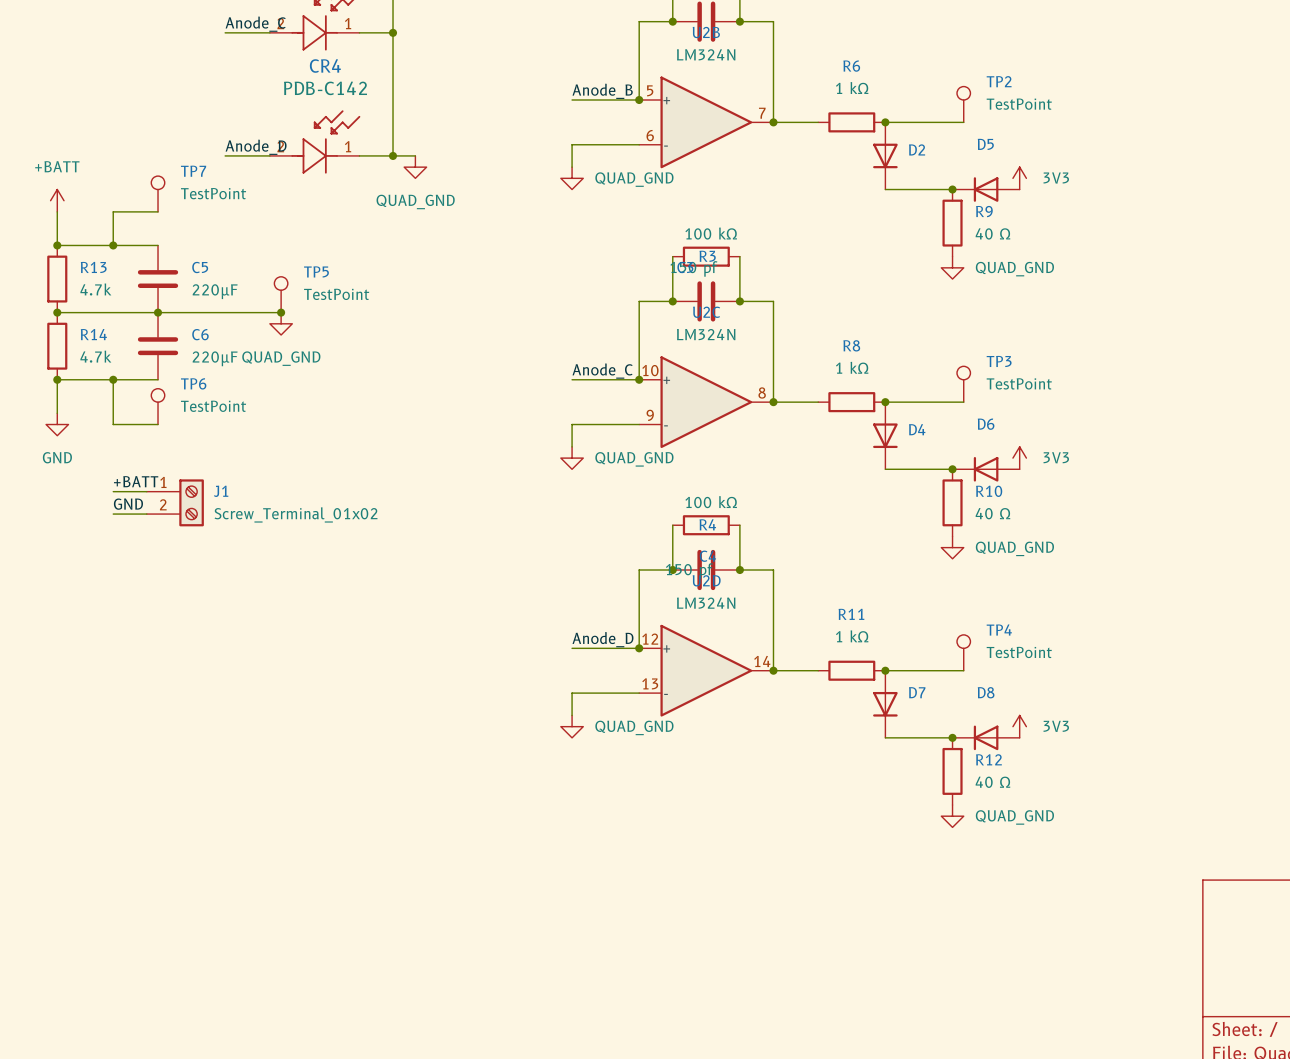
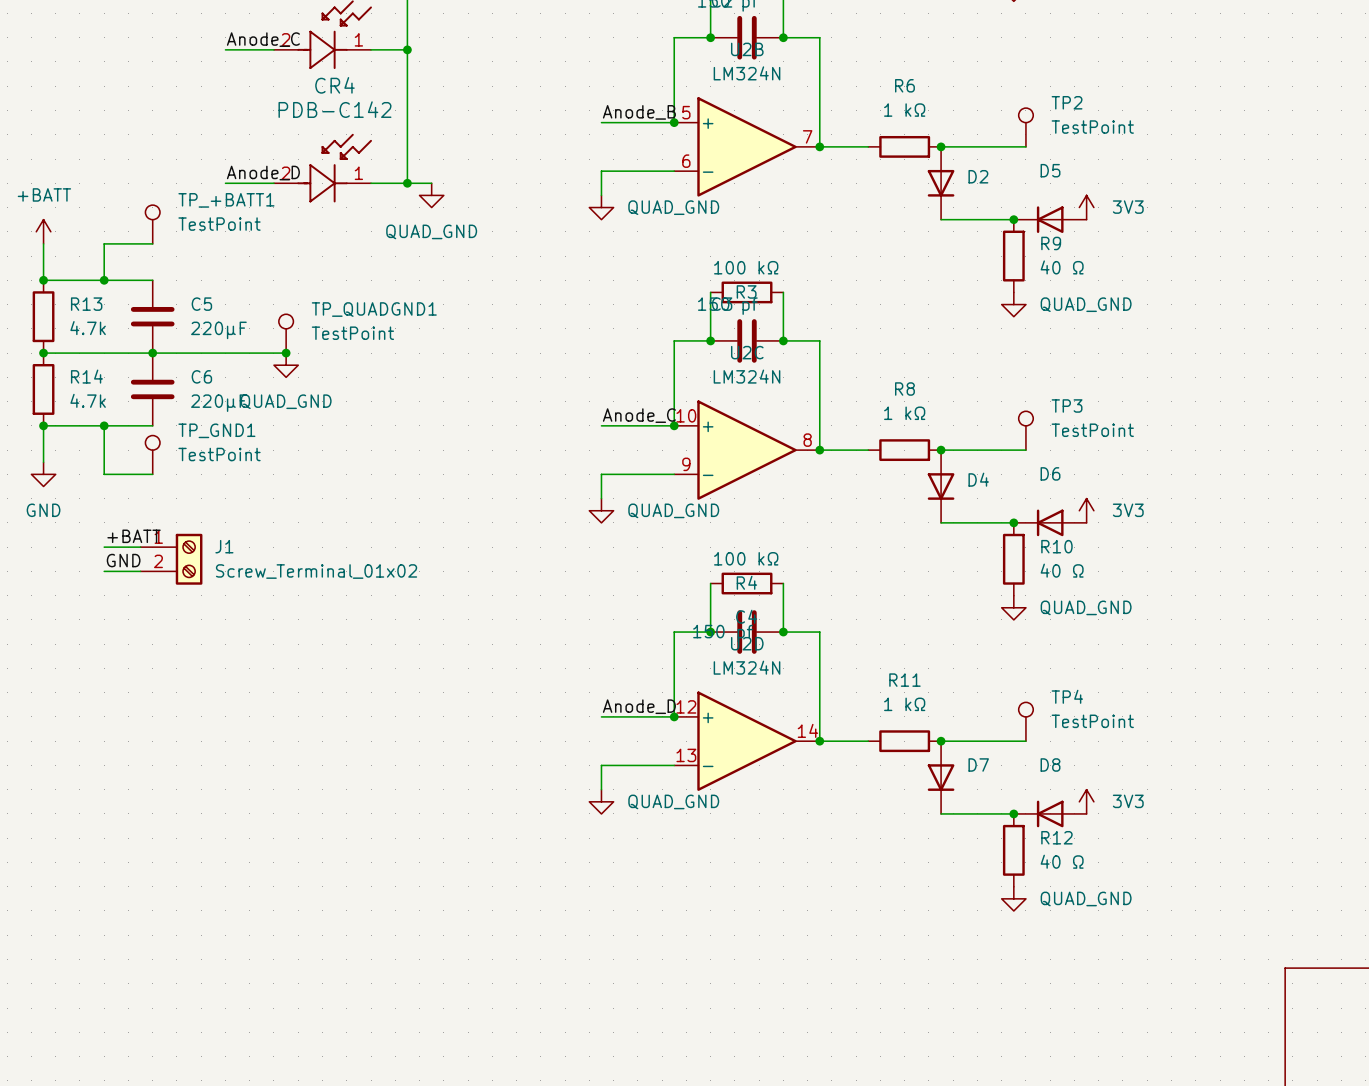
TP7 name: TP7 (193, 171) -> TP_+BATT1 (226, 200)
TP5 name: TP5 (316, 271) -> TP_QUADGND1 (374, 309)
TP6 name: TP6 (193, 383) -> TP_GND1 (216, 430)

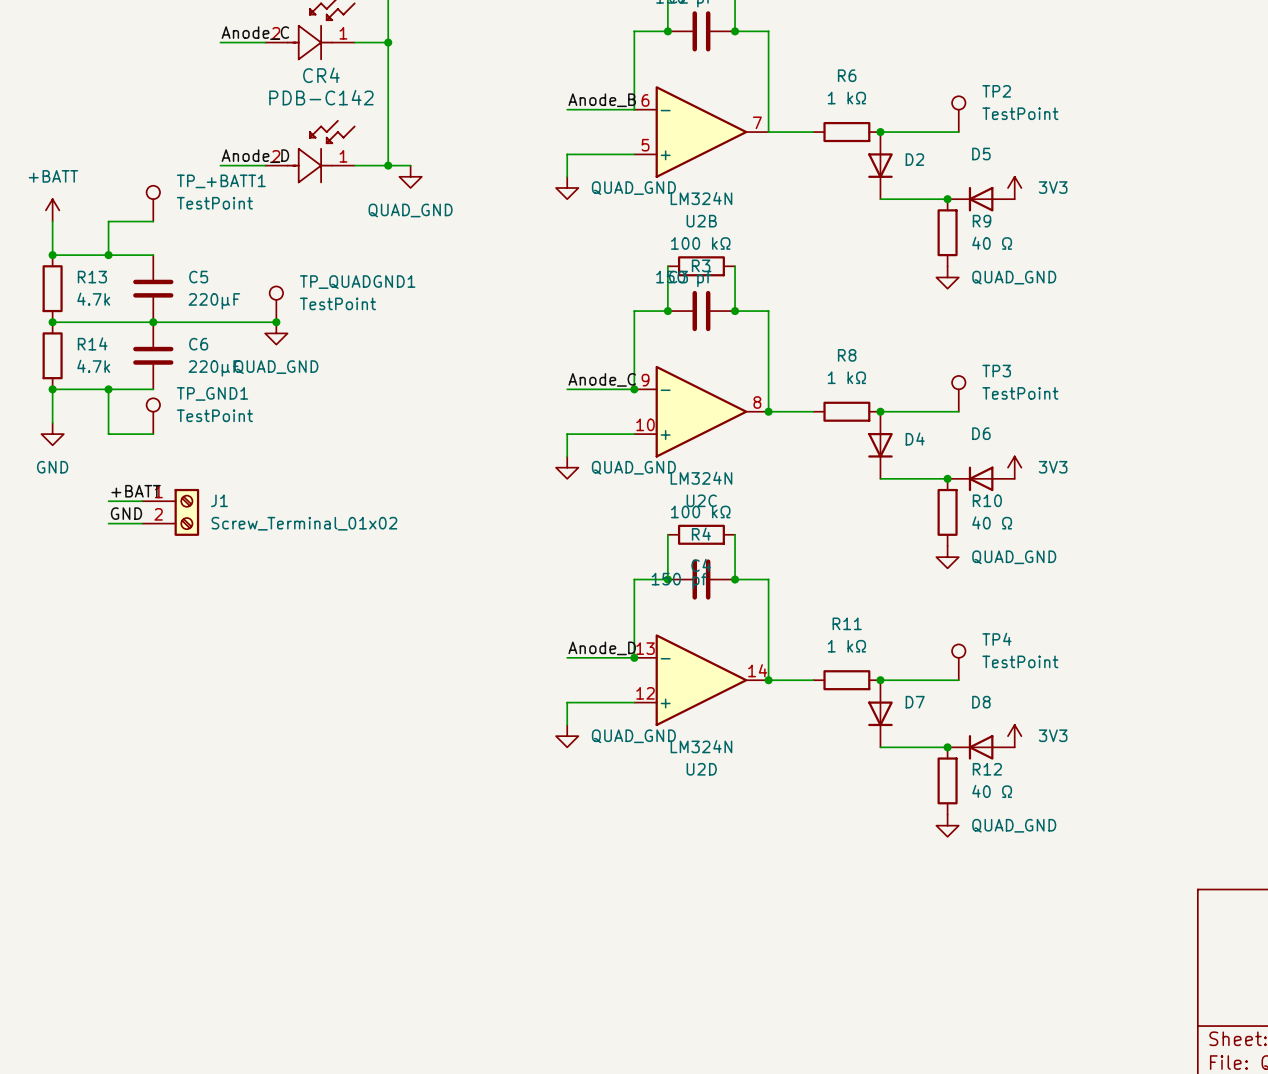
junction: (674, 122) -> none
U2B flip: as is (747, 146) -> up-down (701, 132)
junction: (819, 146) -> none
U2C flip: as is (747, 450) -> up-down (701, 411)
U2D flip: as is (747, 741) -> up-down (701, 680)

